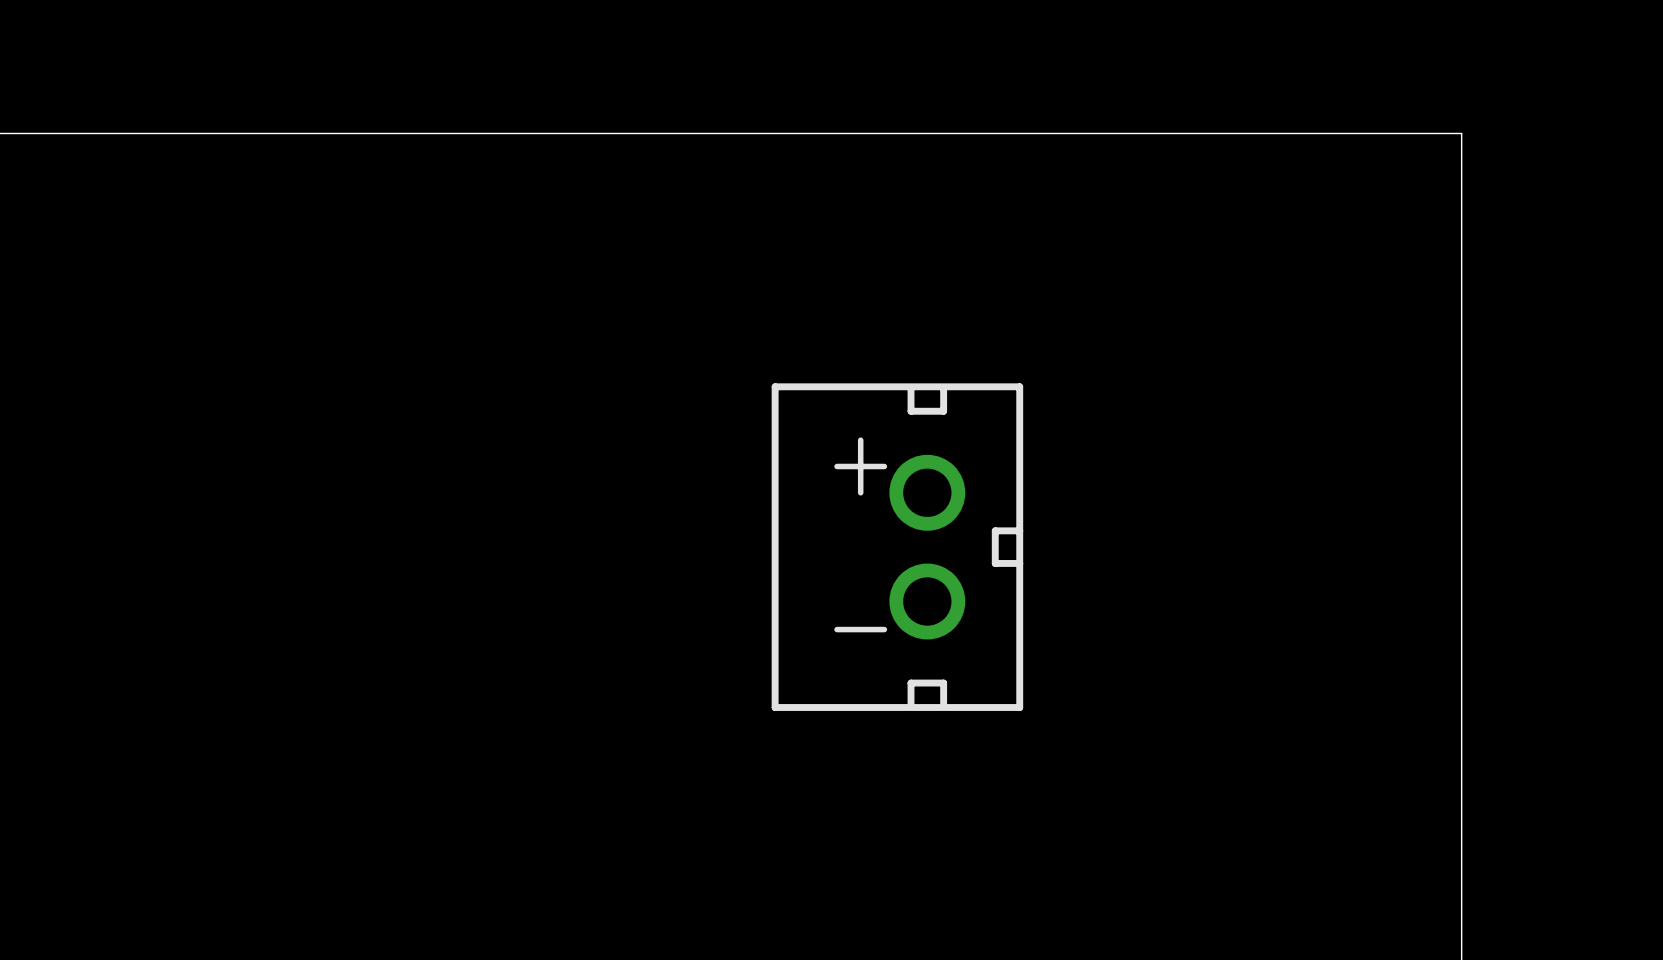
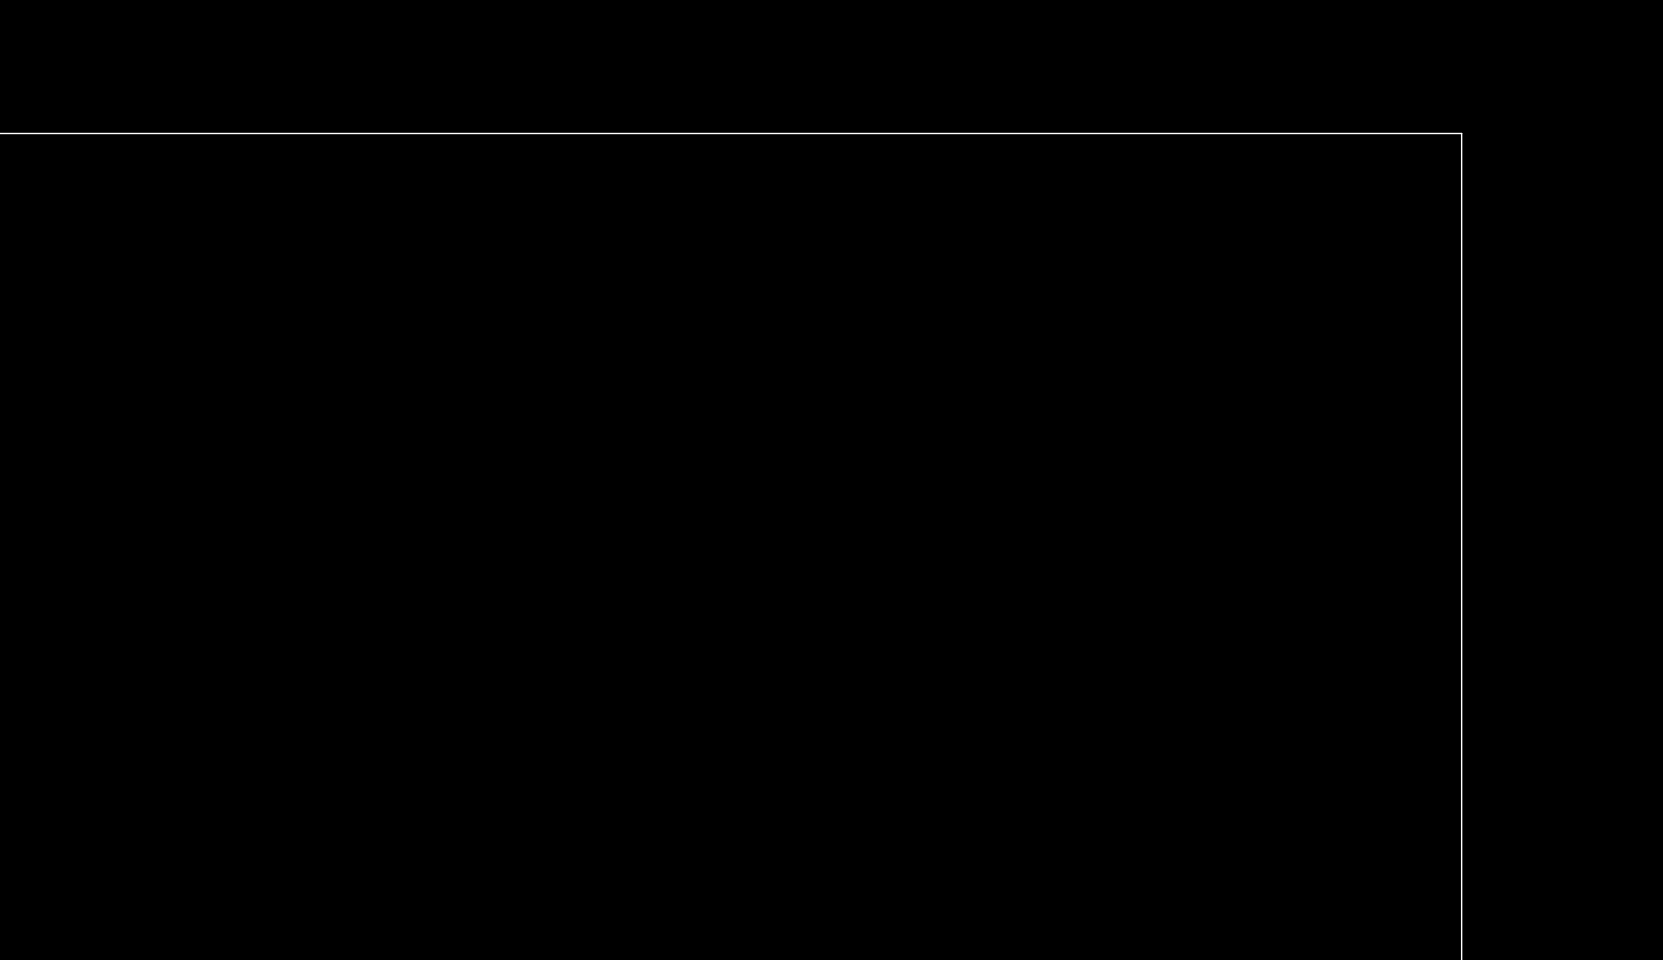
part: (897, 547) -> none

